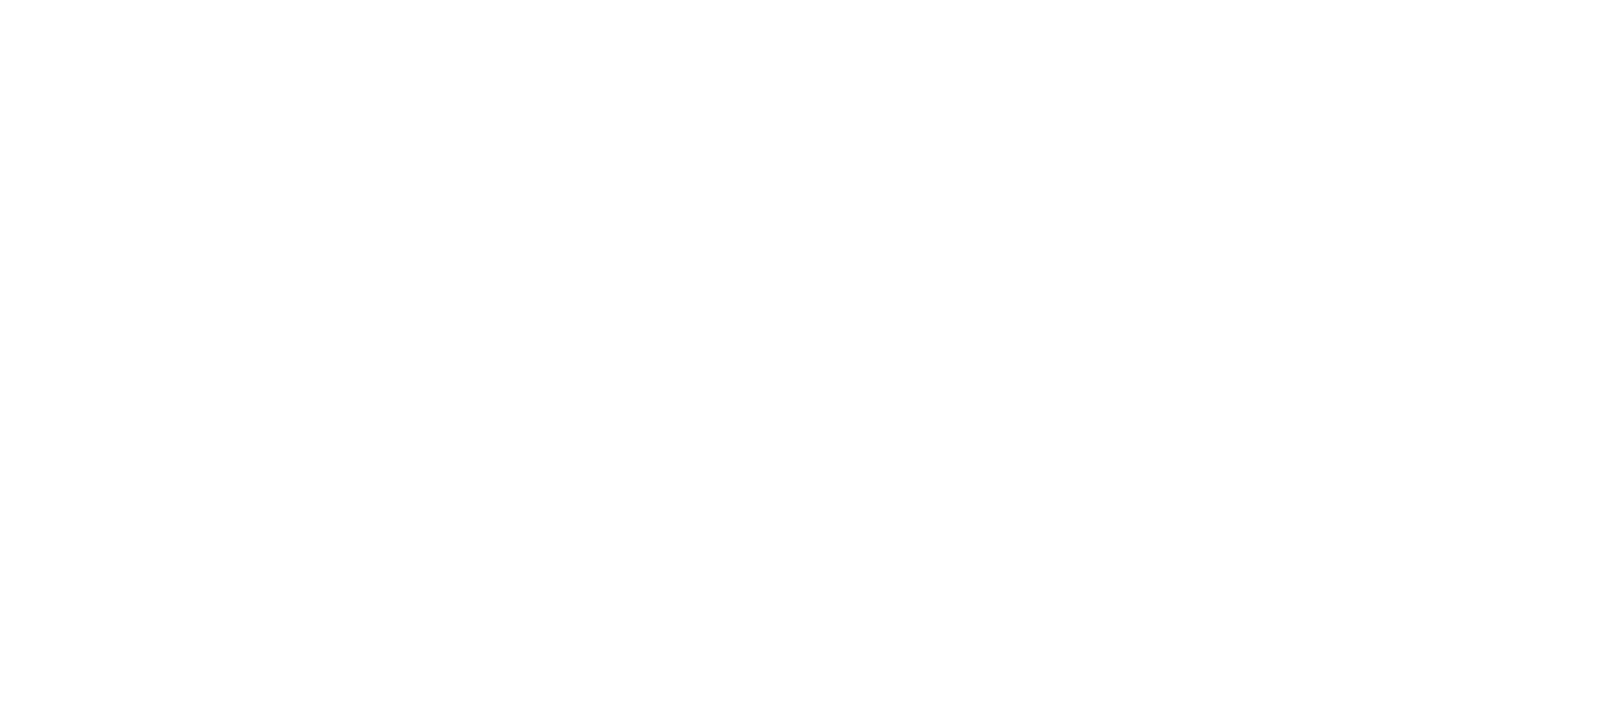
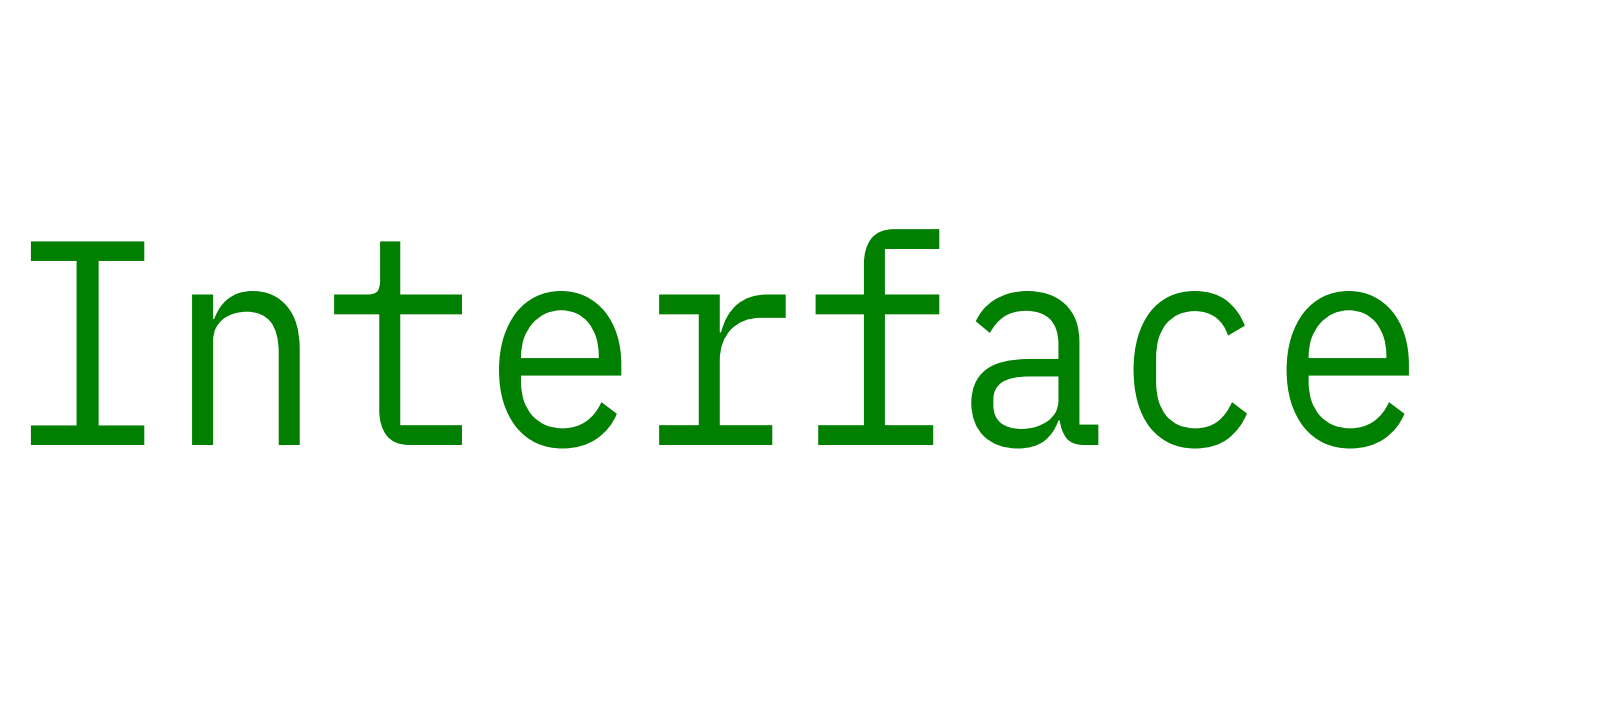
text: none -> Interface (719, 338)

